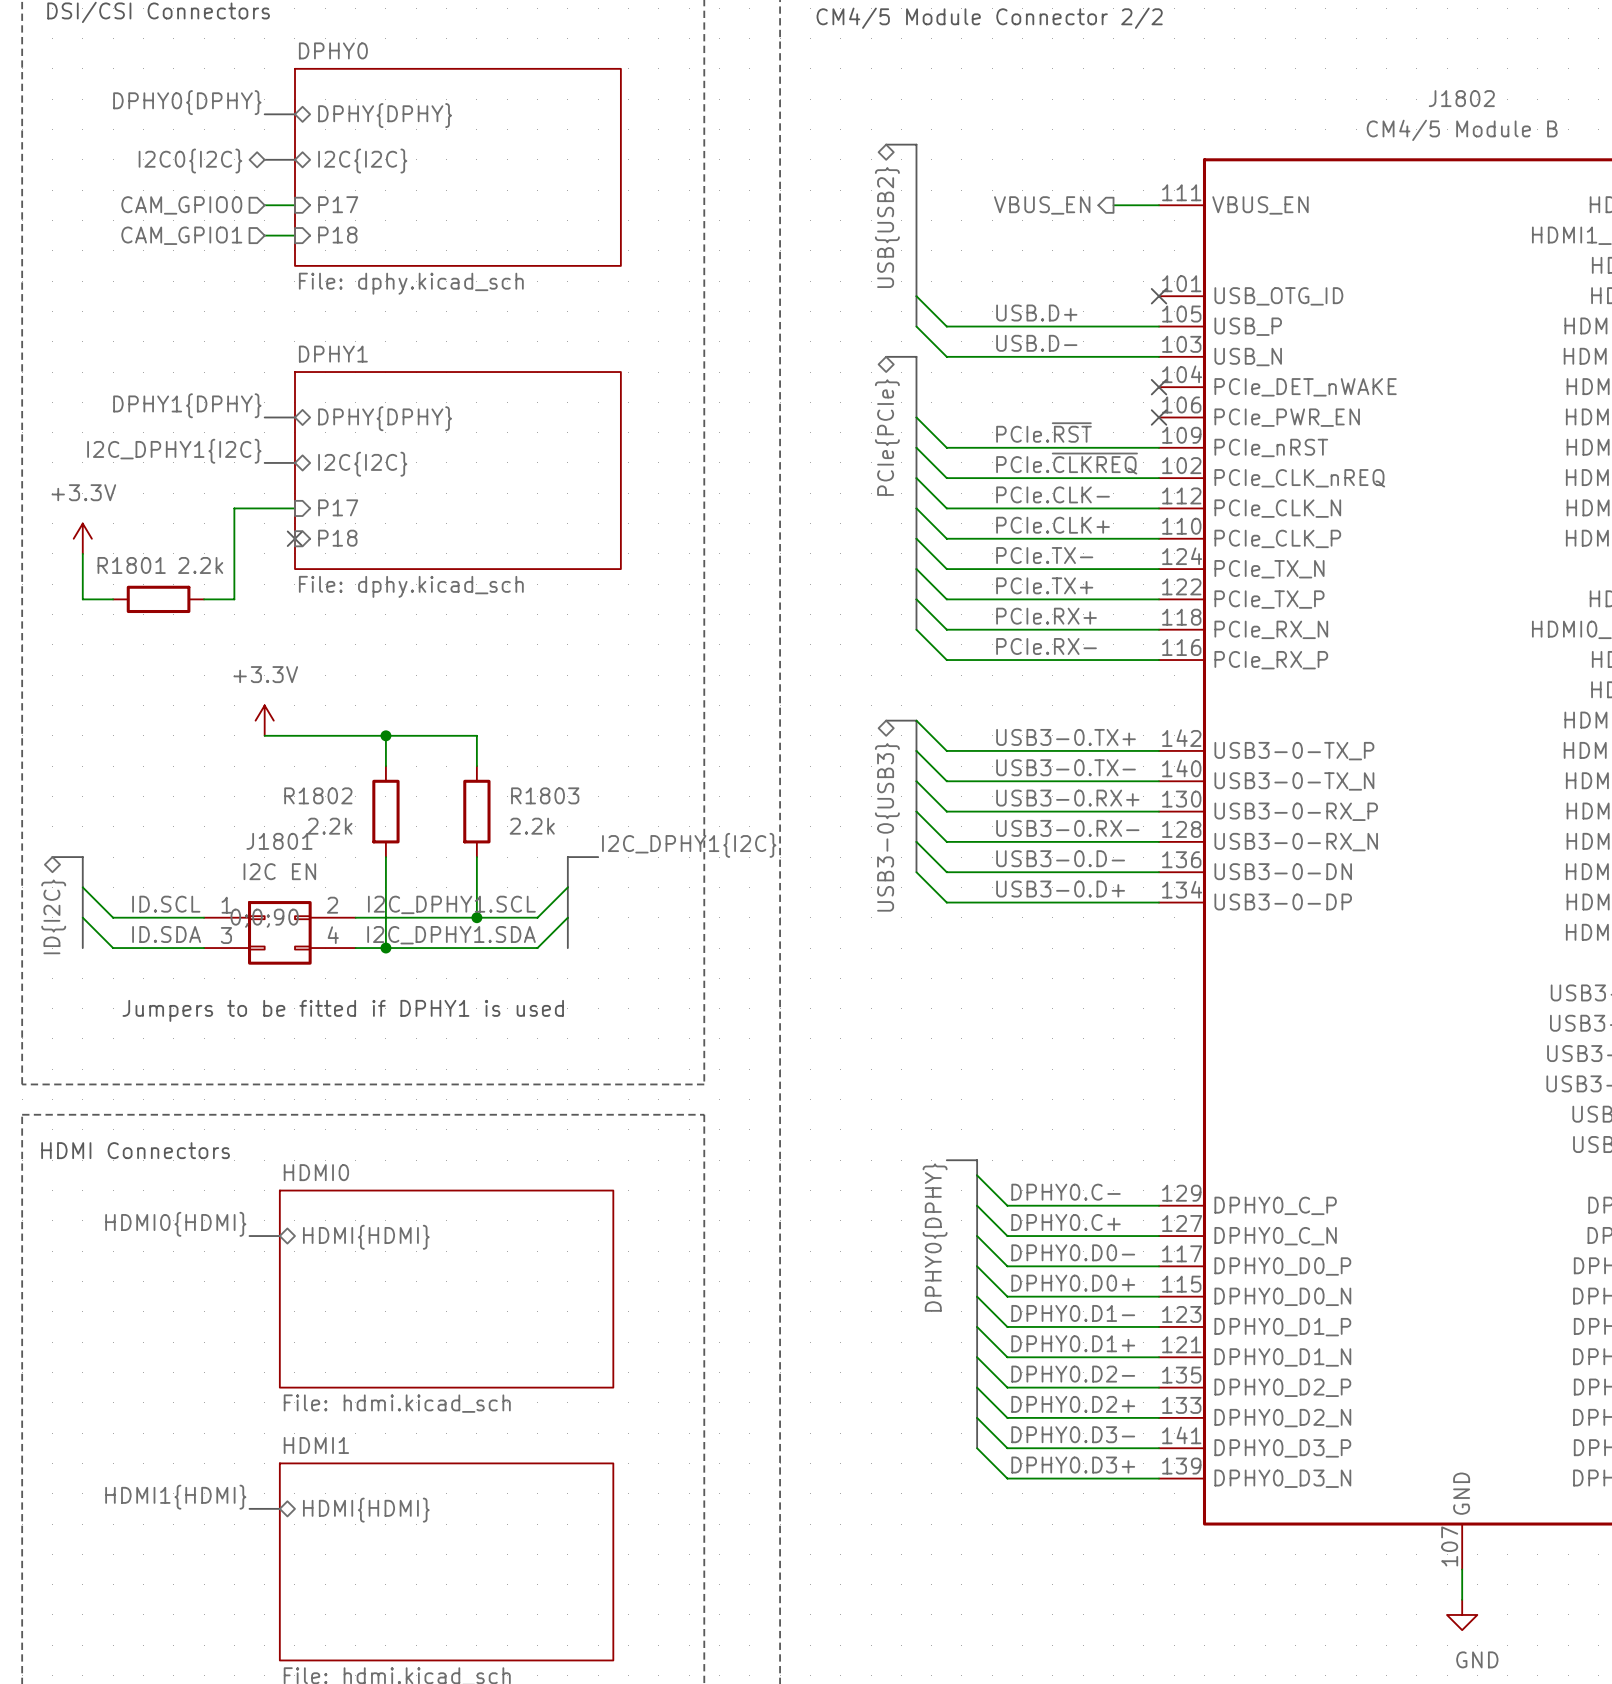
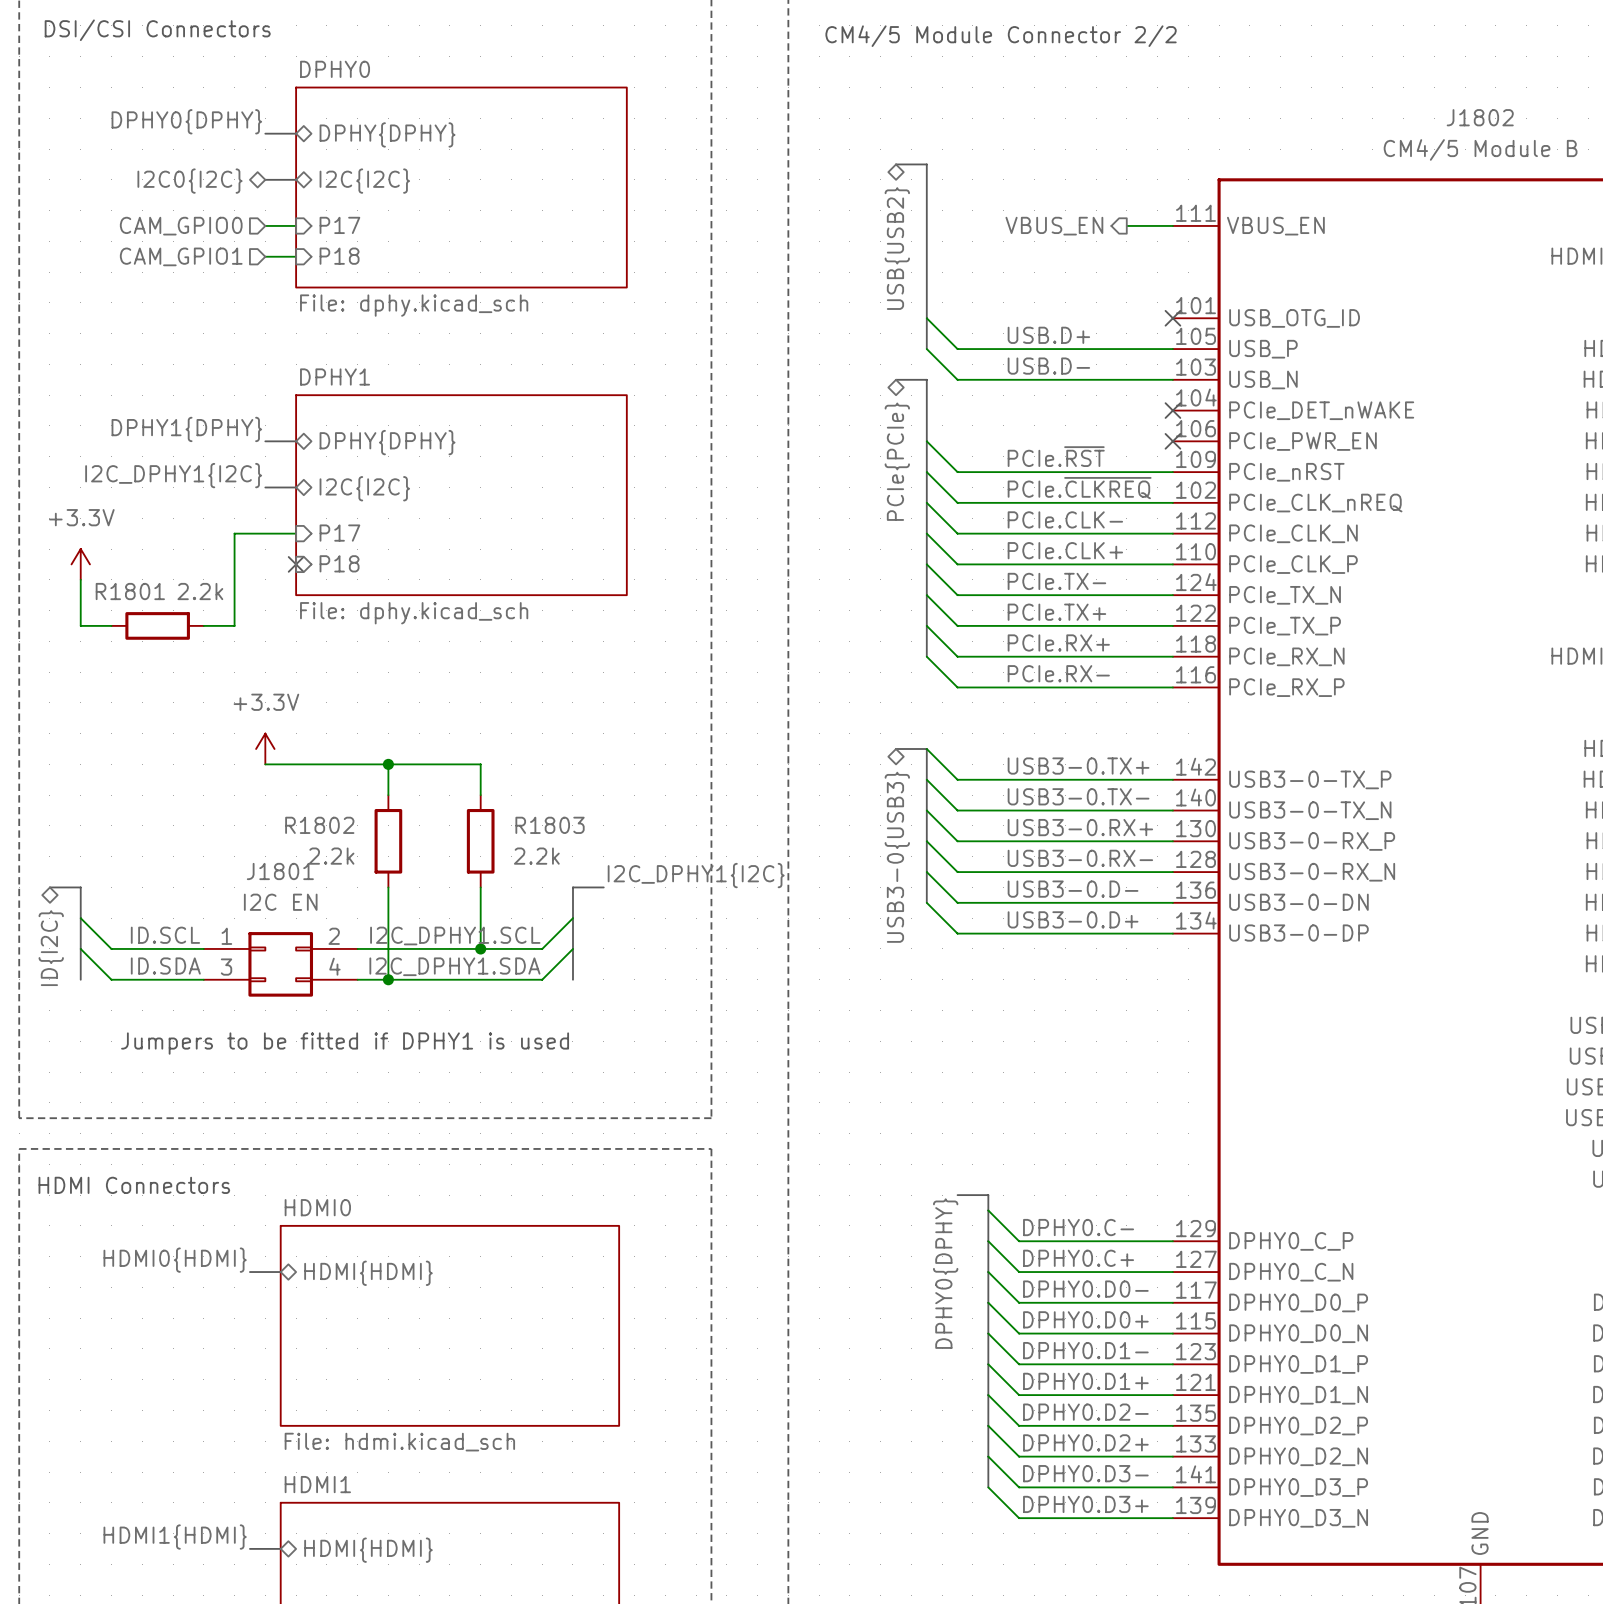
J1801 text: 0;0;90 (264, 918) -> none

